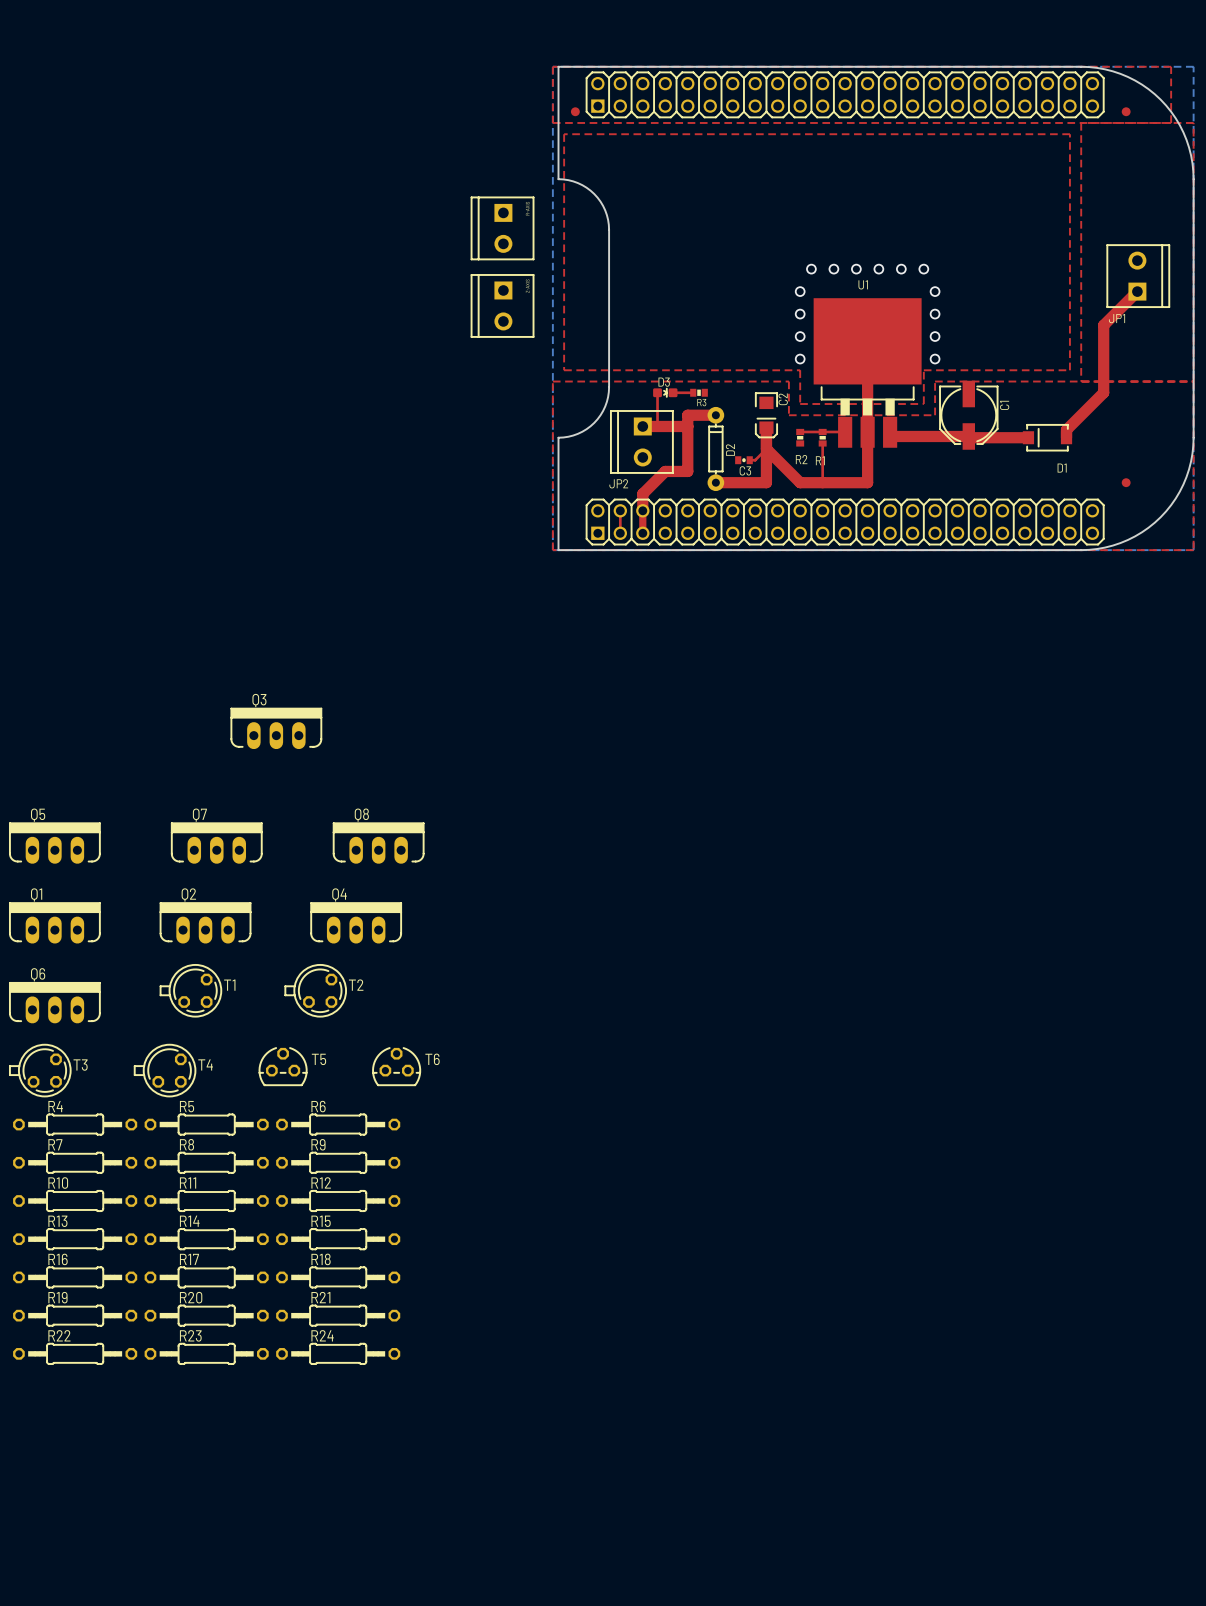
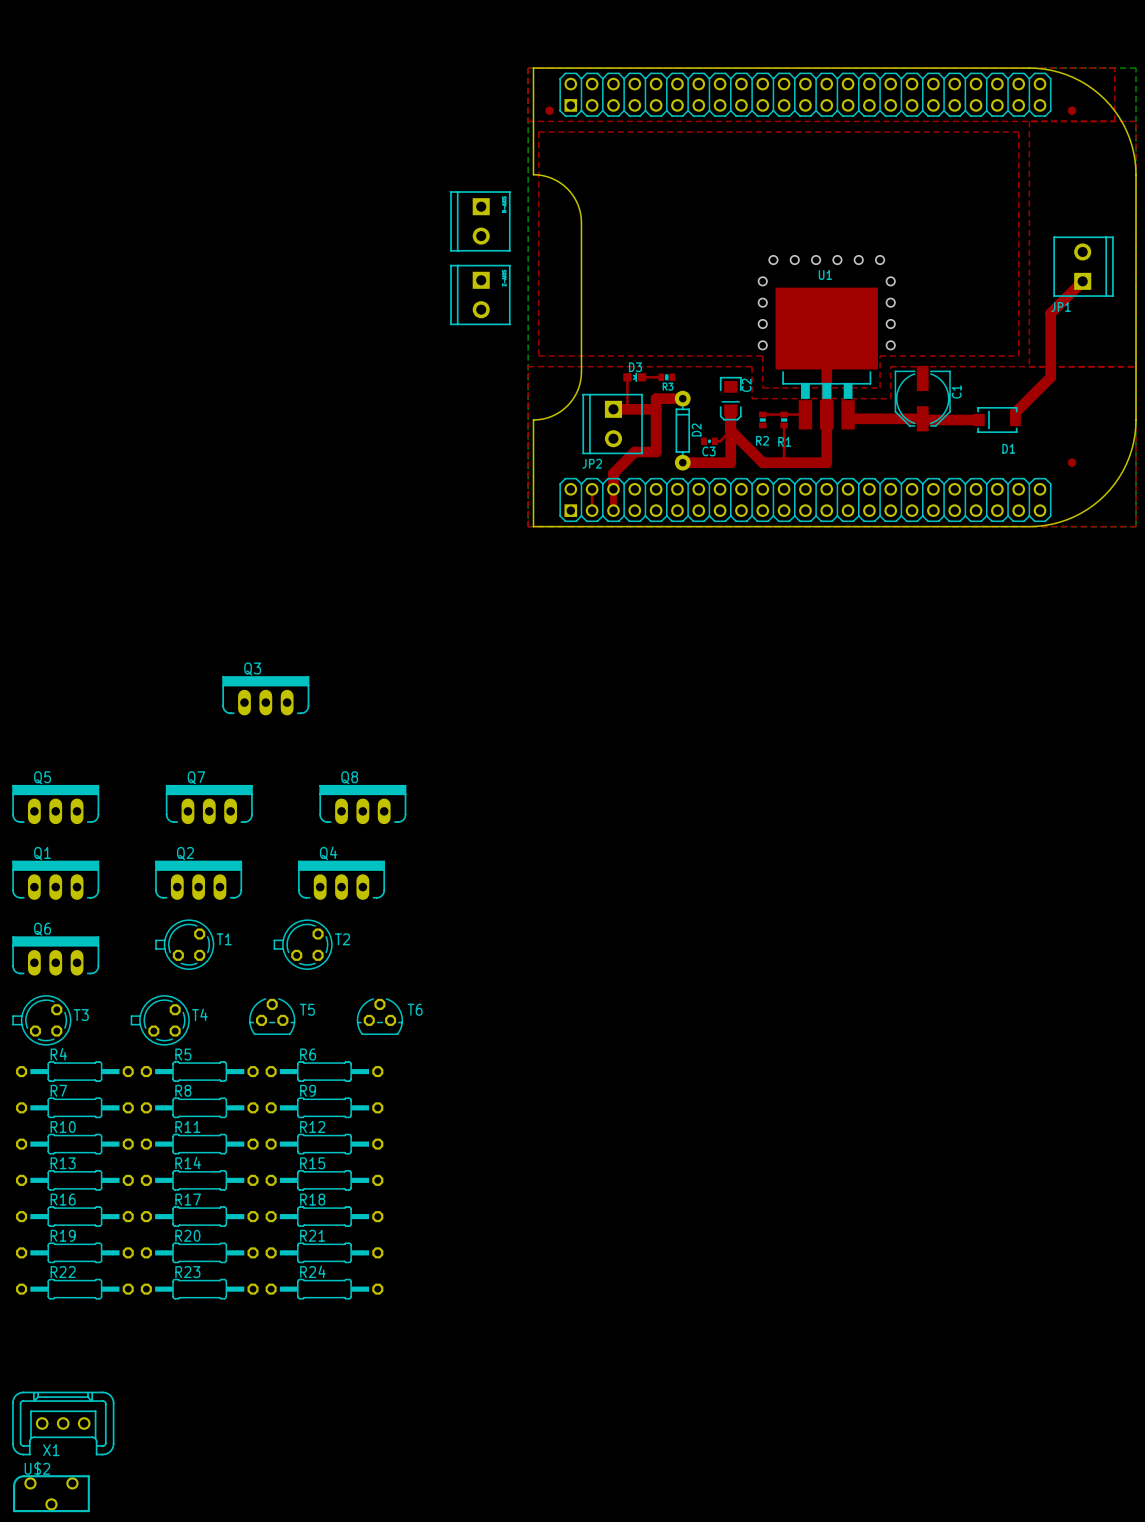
X1: none -> (63, 1423)
U$2: none -> (51, 1493)

